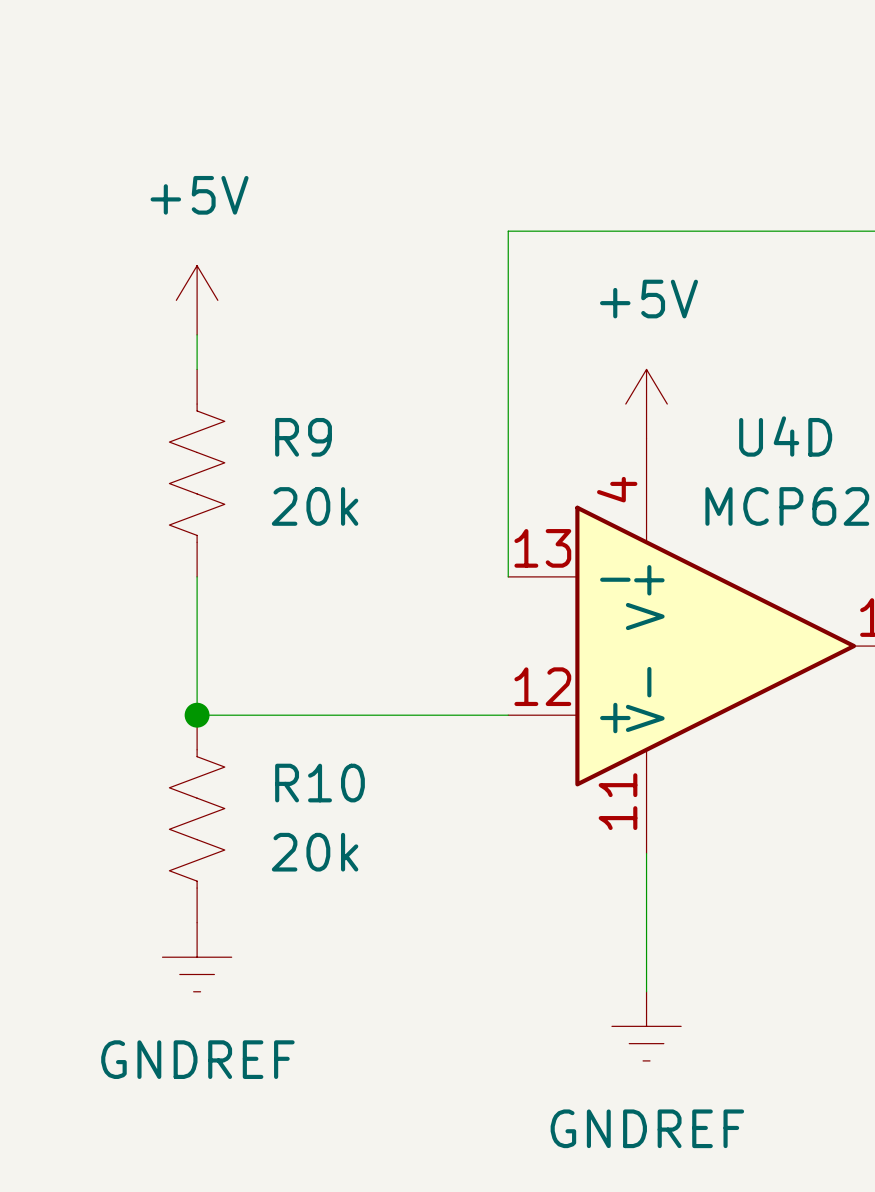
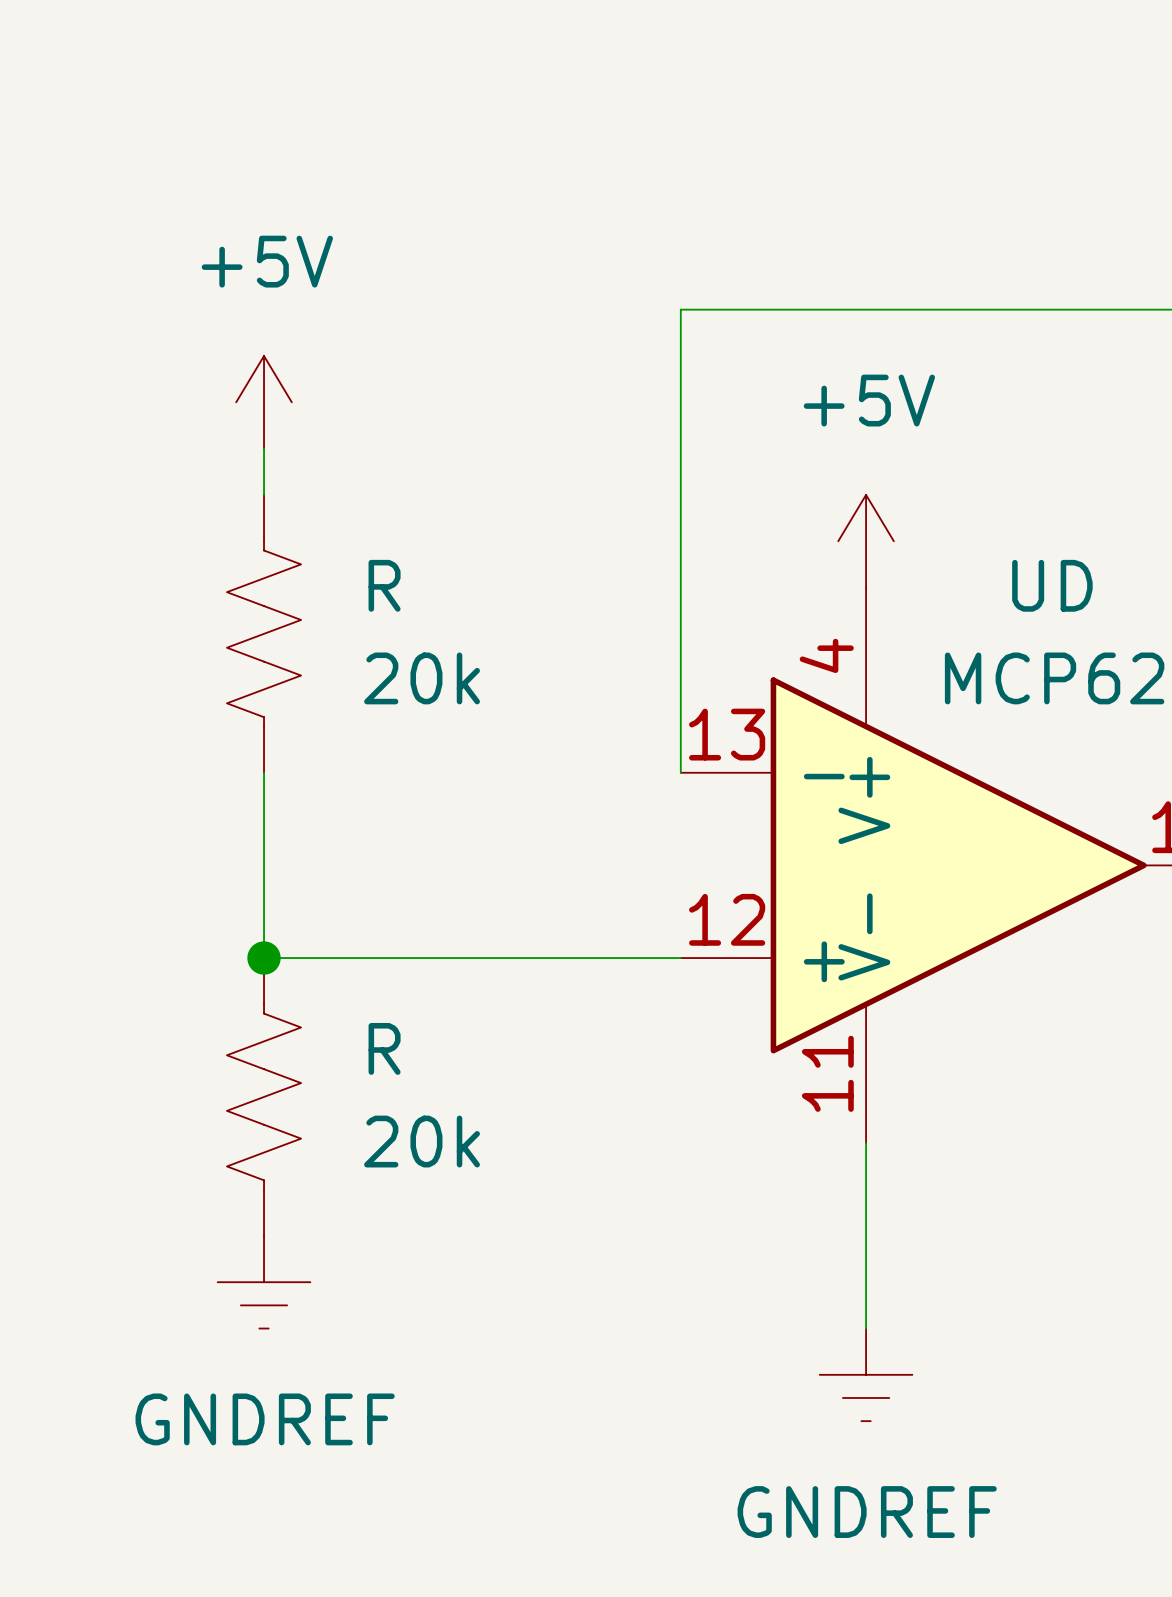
U4D name: U4D (785, 436) -> UD (1052, 585)
R9 name: R9 (303, 437) -> R (384, 585)
R10 name: R10 (320, 783) -> R (384, 1048)

